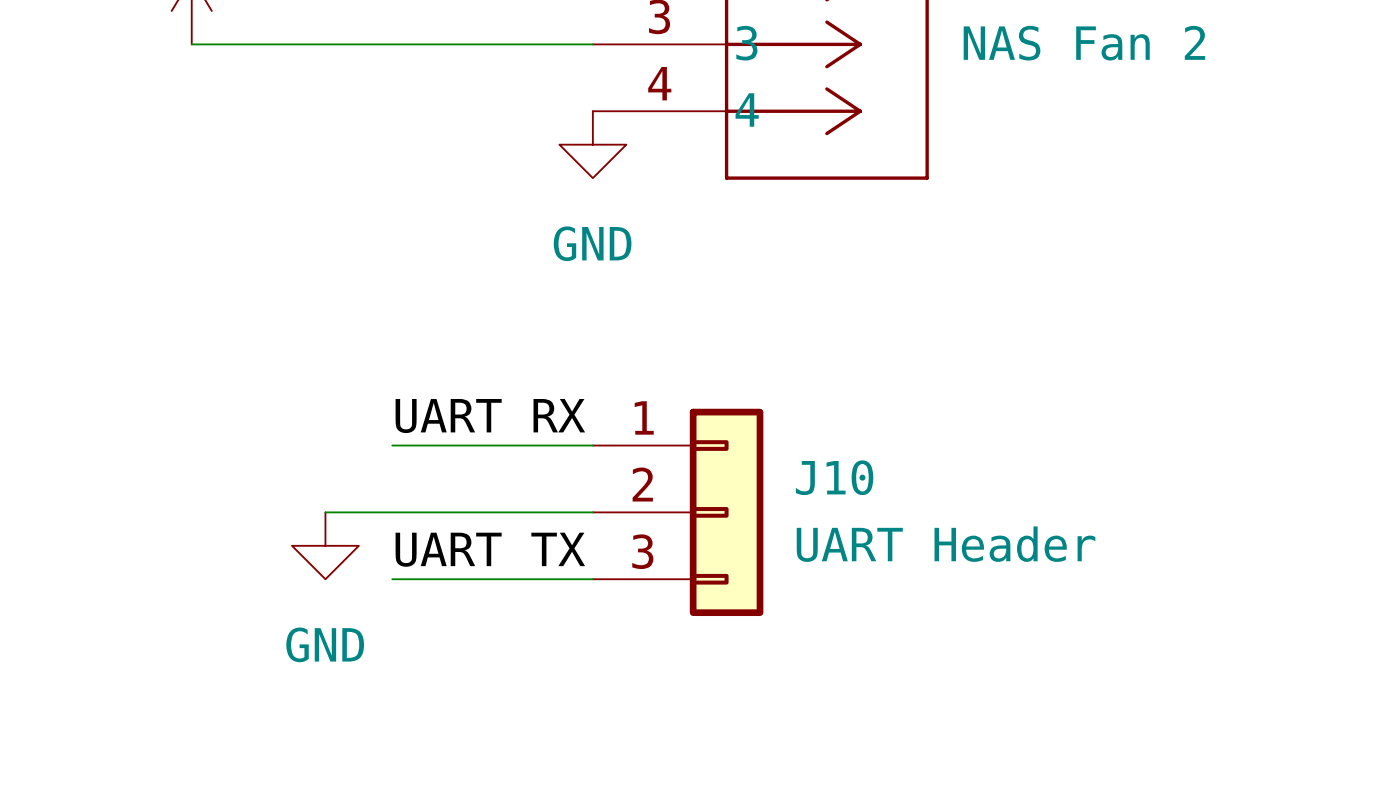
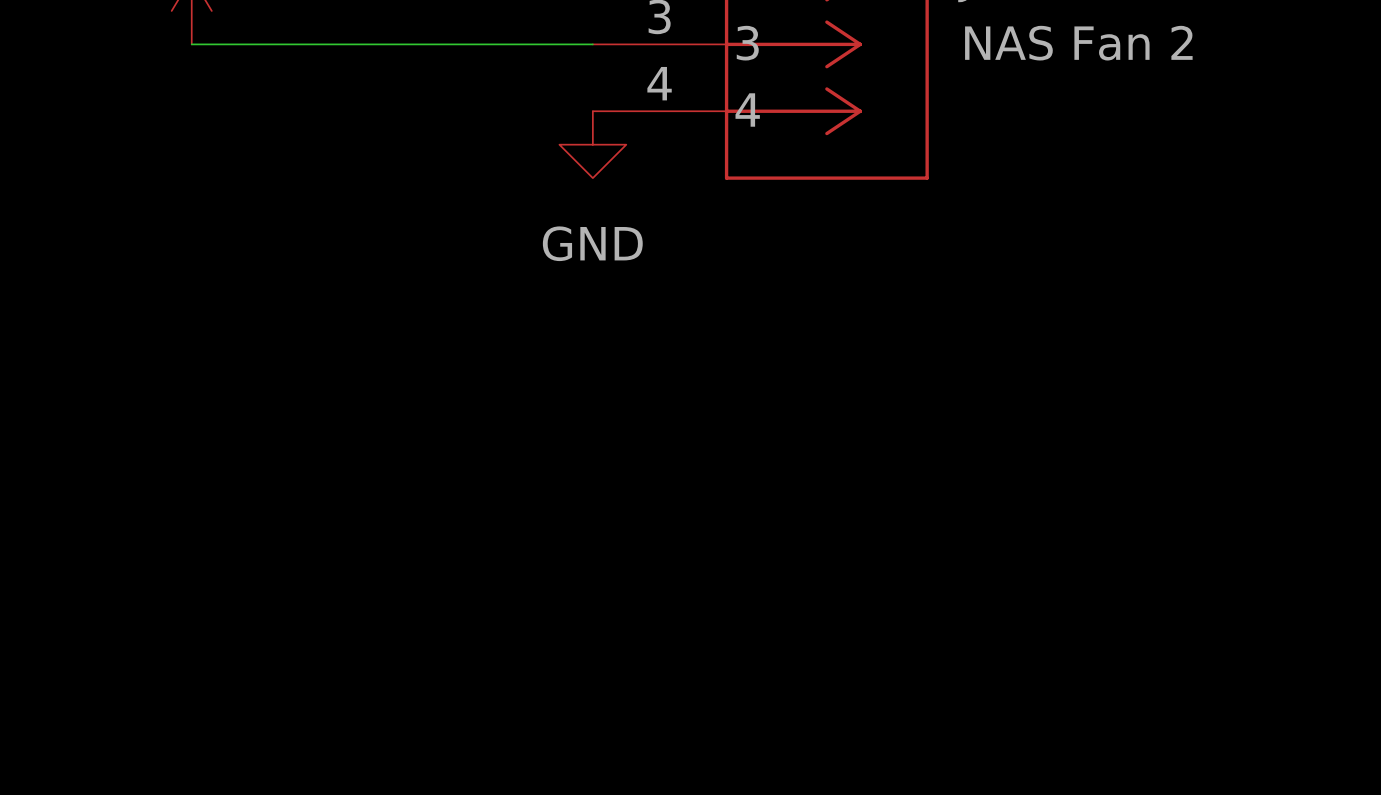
label: UART RX (490, 416) -> none
wire: (392, 445) (592, 445) -> none
wire: (325, 512) (592, 512) -> none
J10: UART Header (678, 512) -> none
power symbol: GND (325, 545) -> none
label: UART TX (490, 549) -> none
wire: (392, 579) (592, 579) -> none

